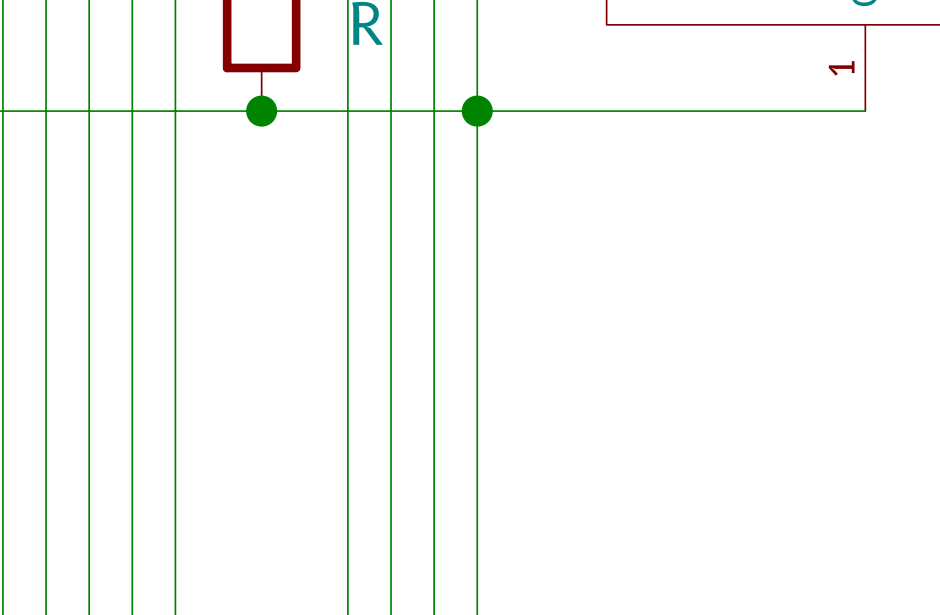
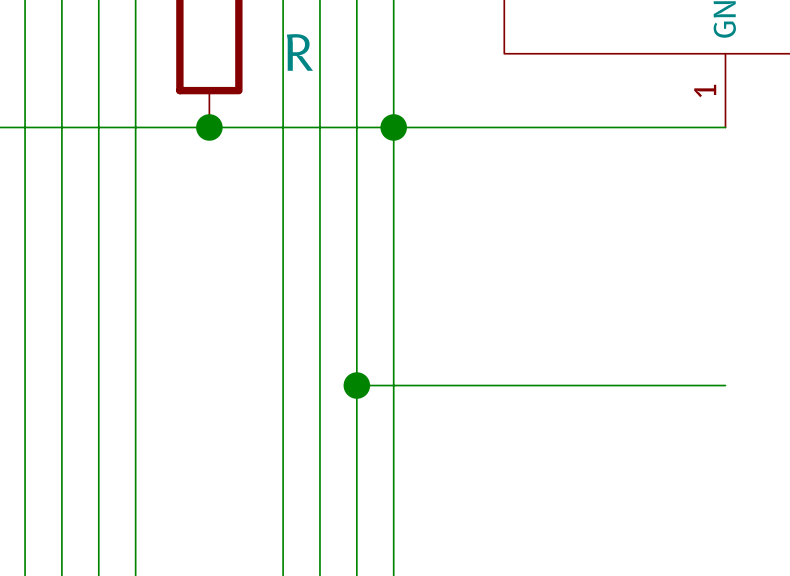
wire: none -> (356, 385) (725, 385)
junction: none -> (356, 385)

